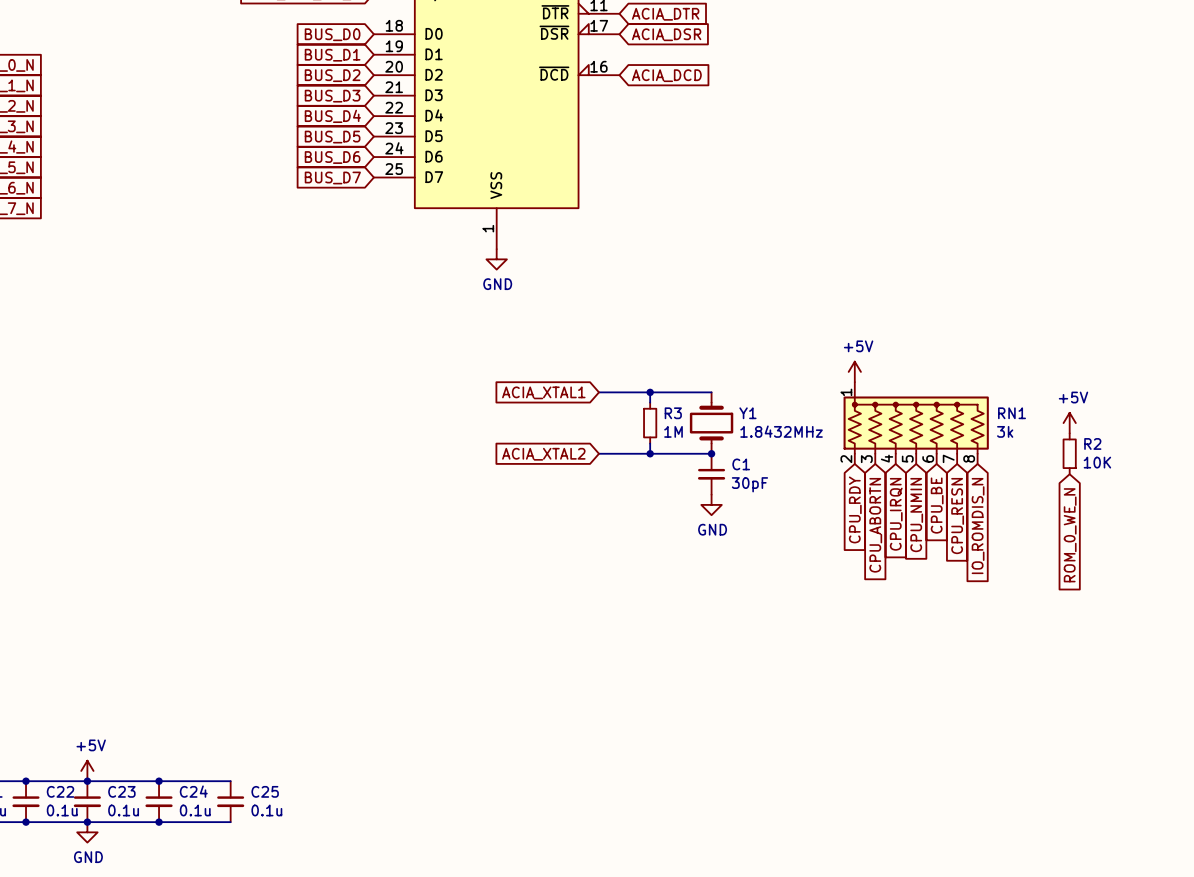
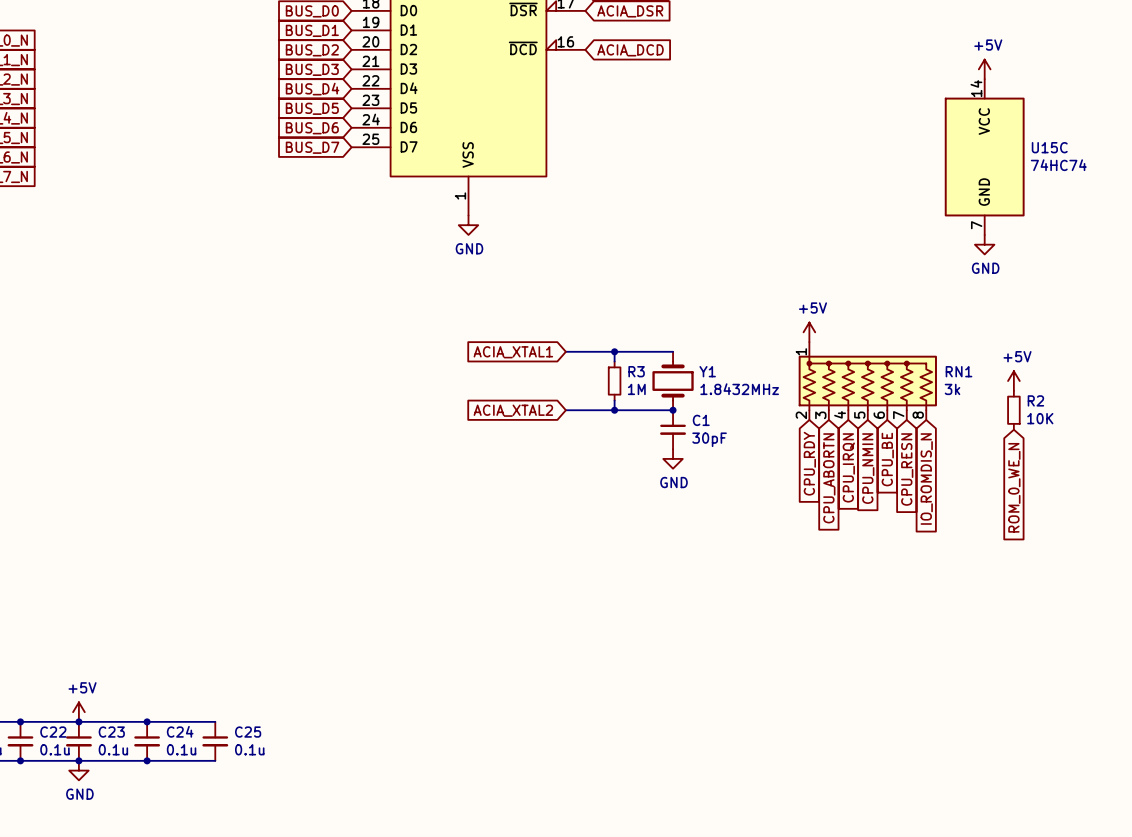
power symbol: none -> +5V (984, 69)
U15C: none -> 74HC74 (984, 157)
power symbol: none -> GND (984, 244)

